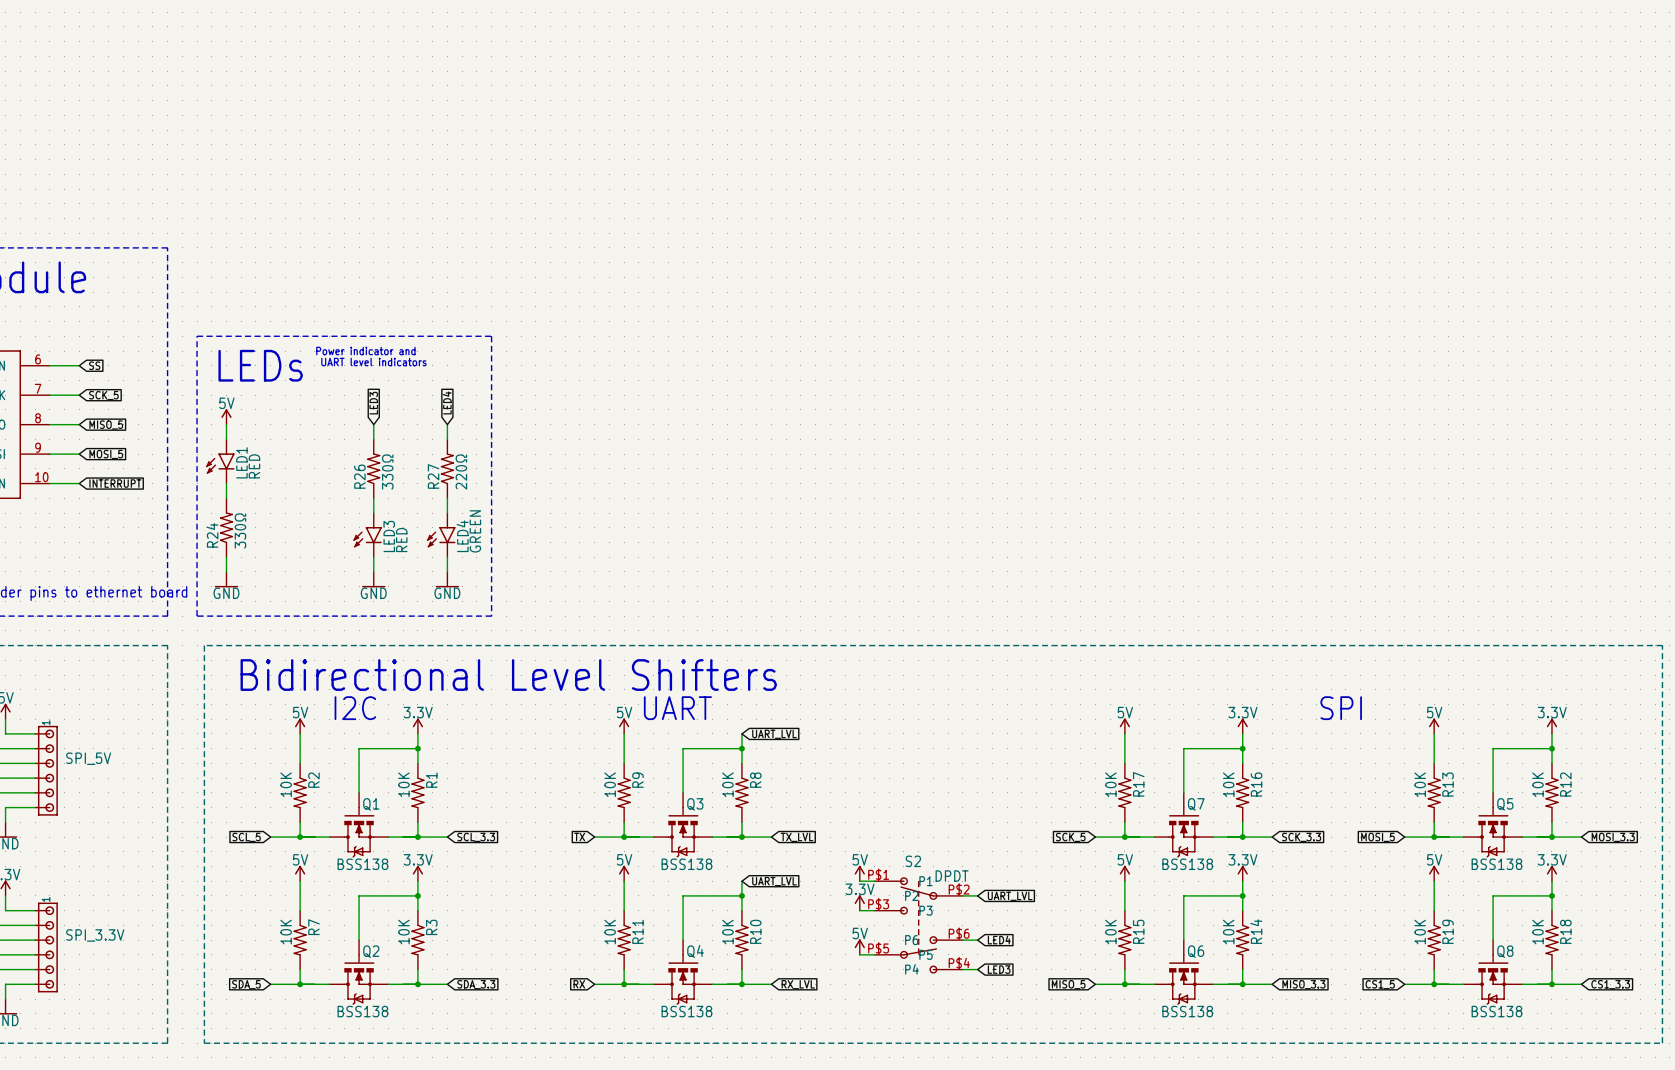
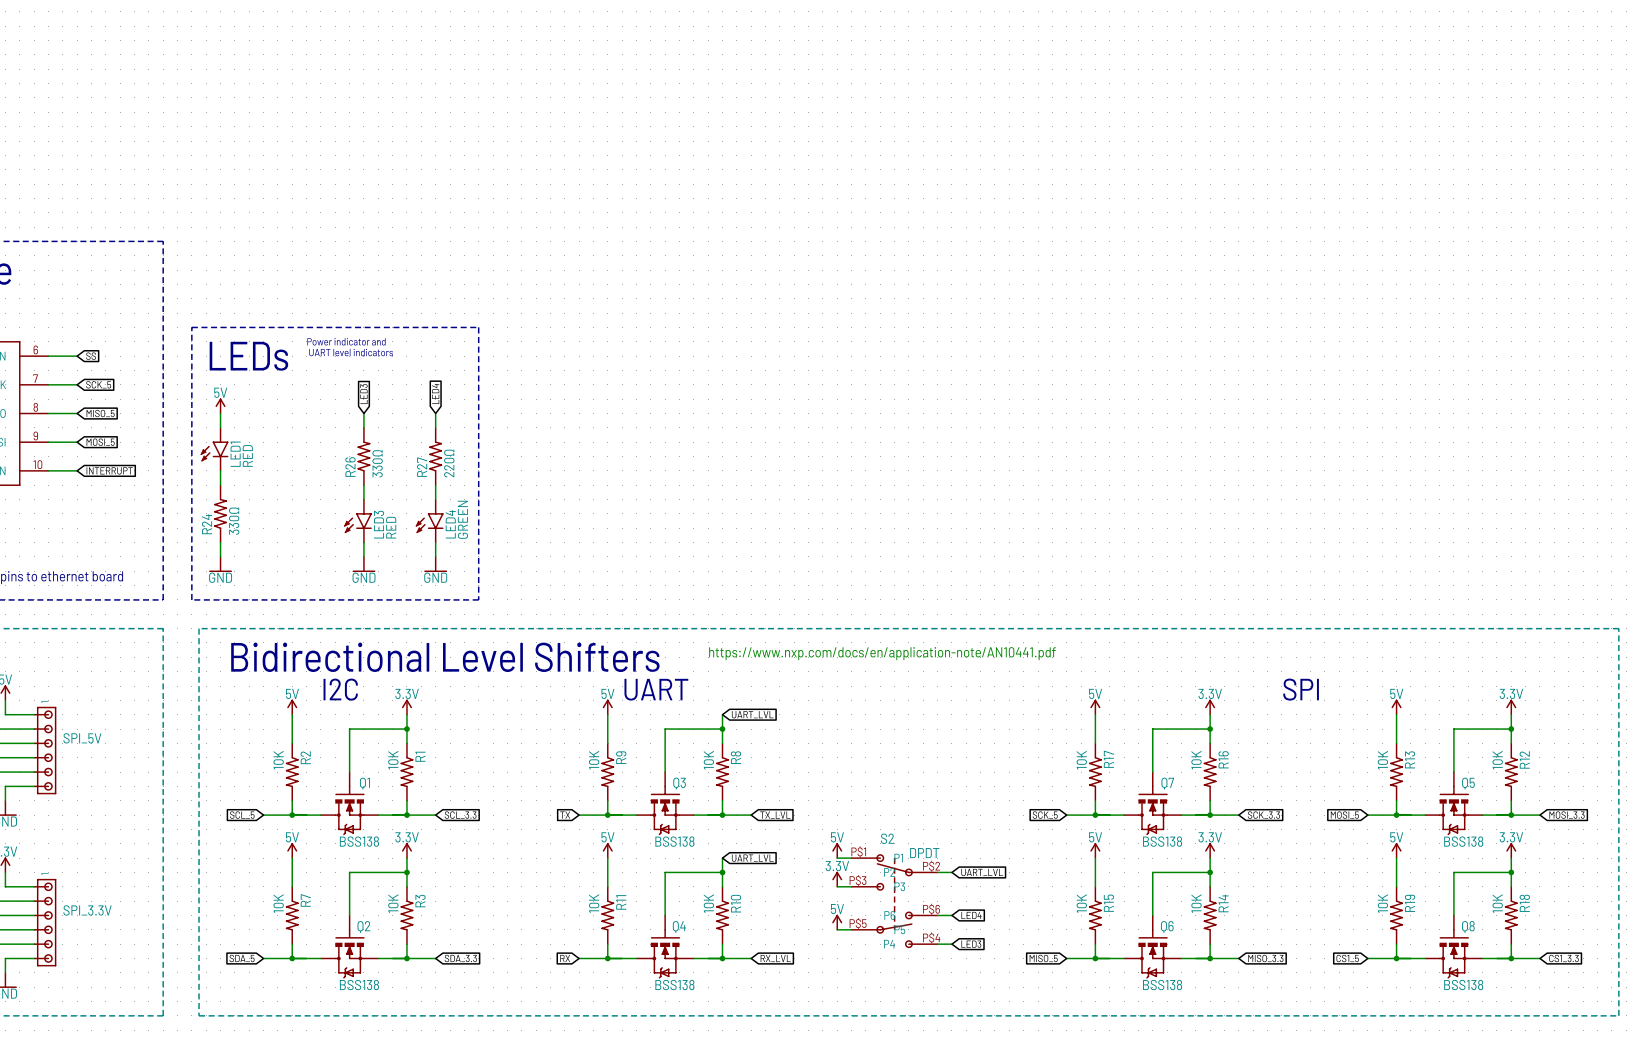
text: none -> https://www.nxp.com/docs/en/application-note/AN10441.pdf (882, 653)

